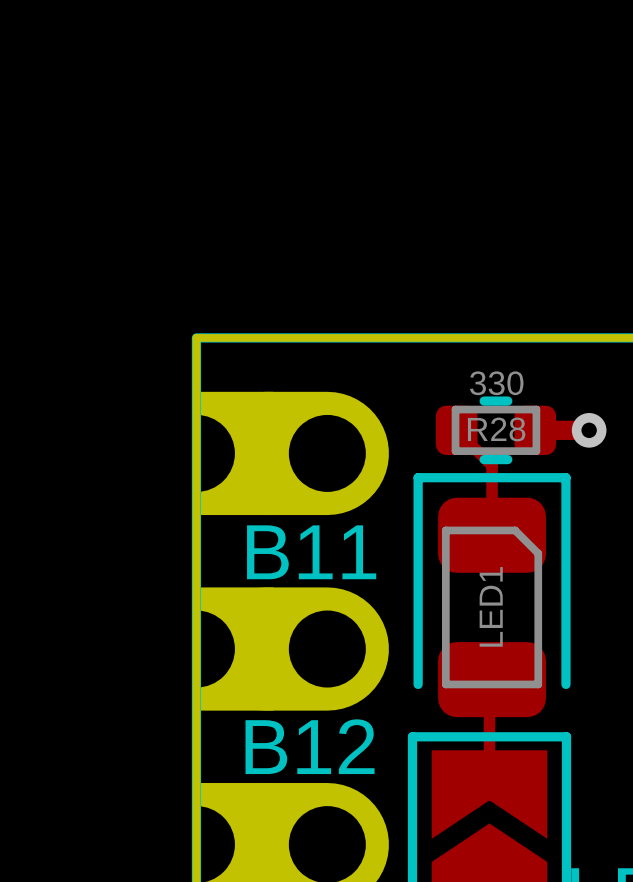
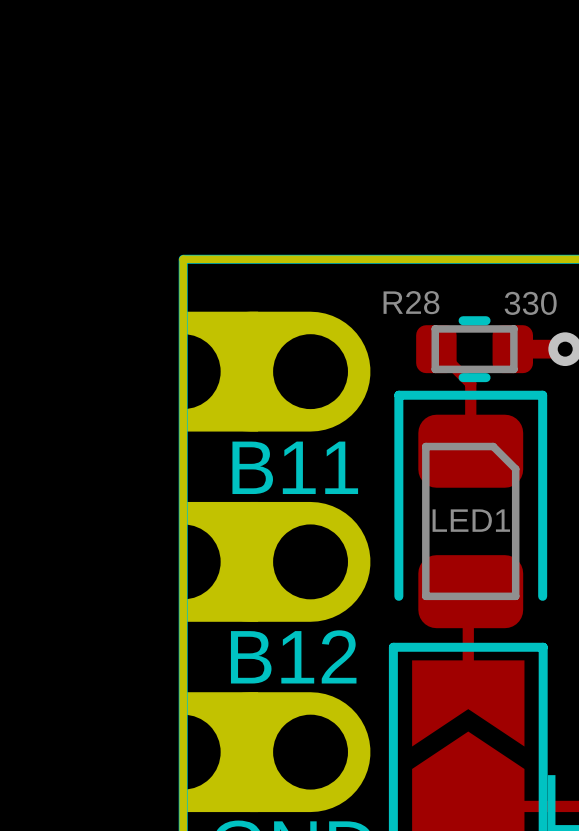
R28 value position: 330 (496, 383) -> 330 (530, 303)
R28 name position: R28 (496, 429) -> R28 (411, 302)
LED1 name rotation: 0° (491, 606) -> 90° clockwise (471, 520)

